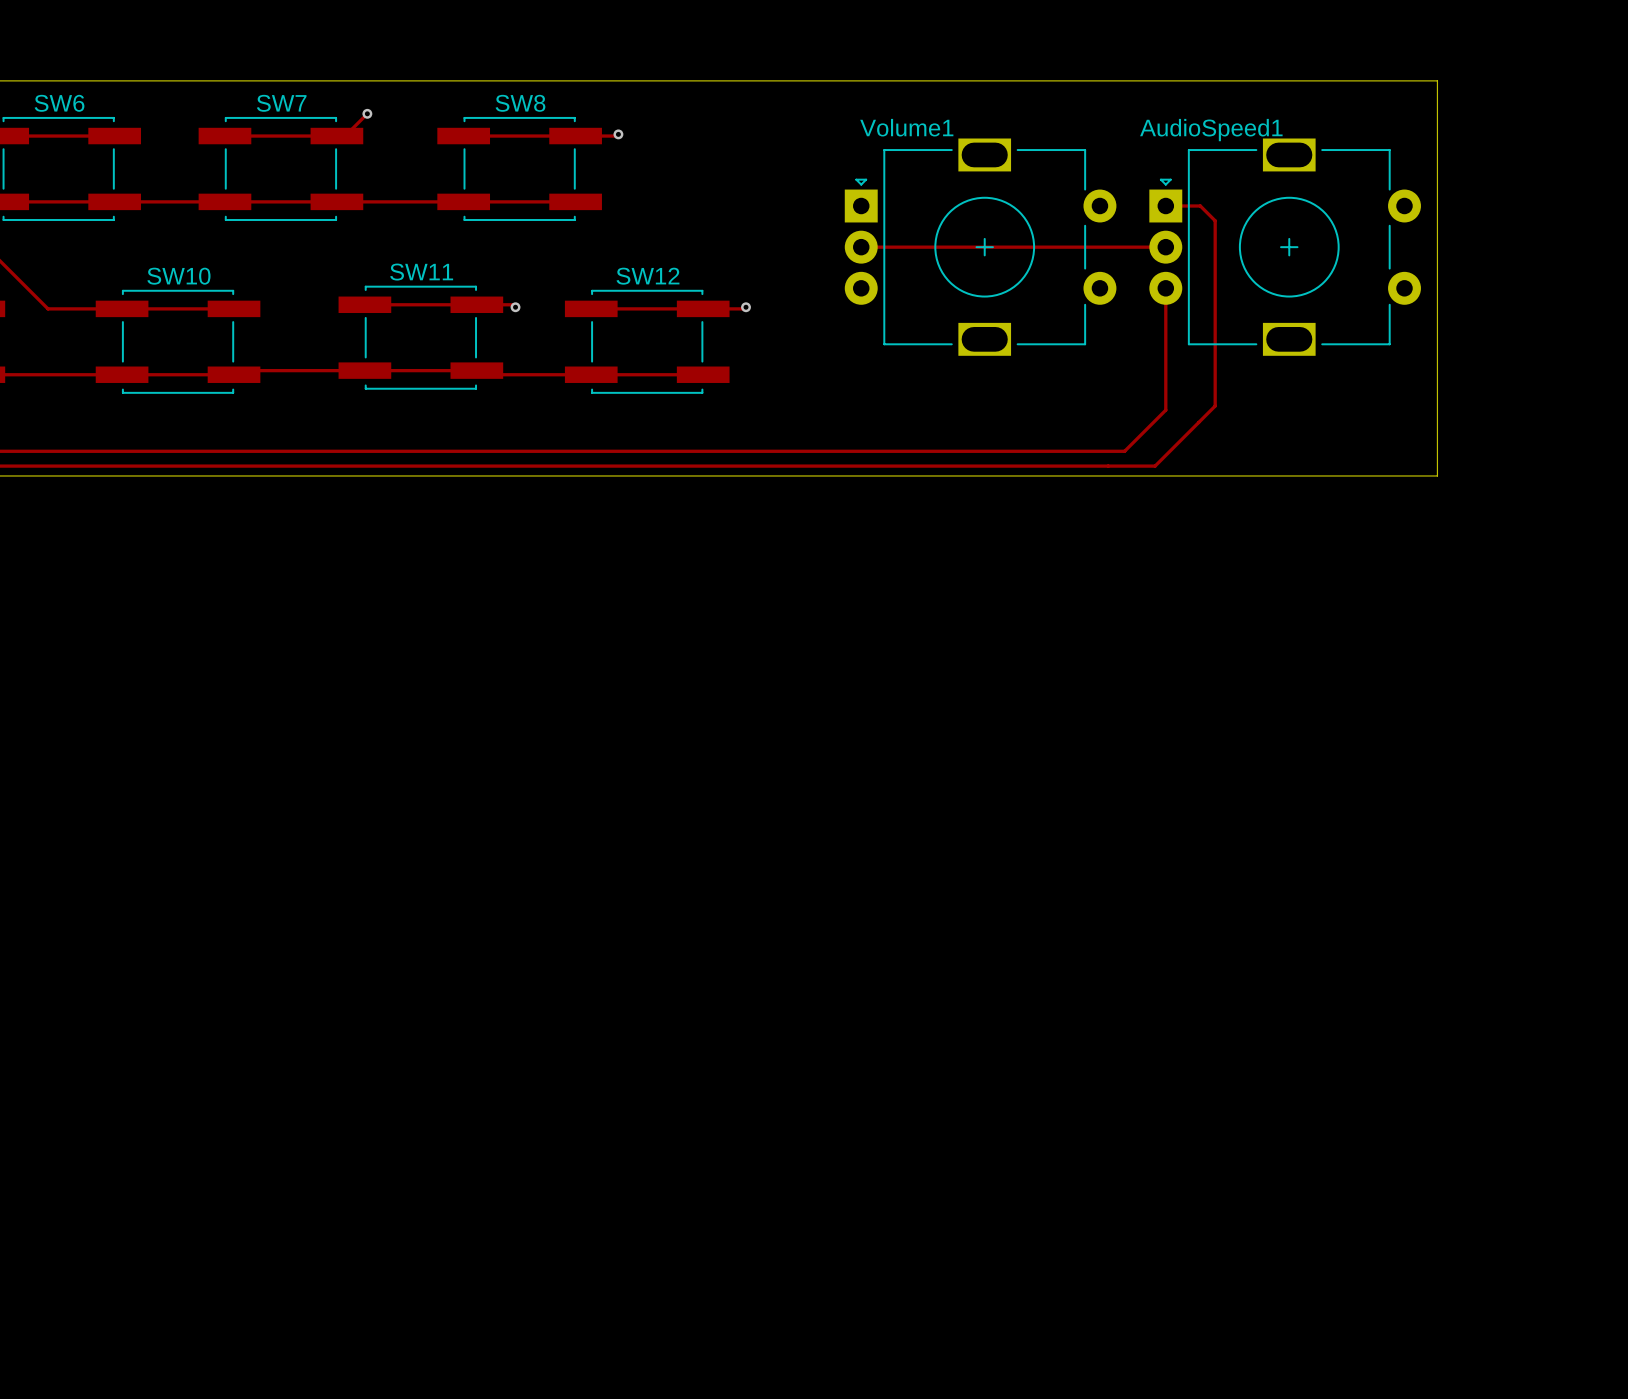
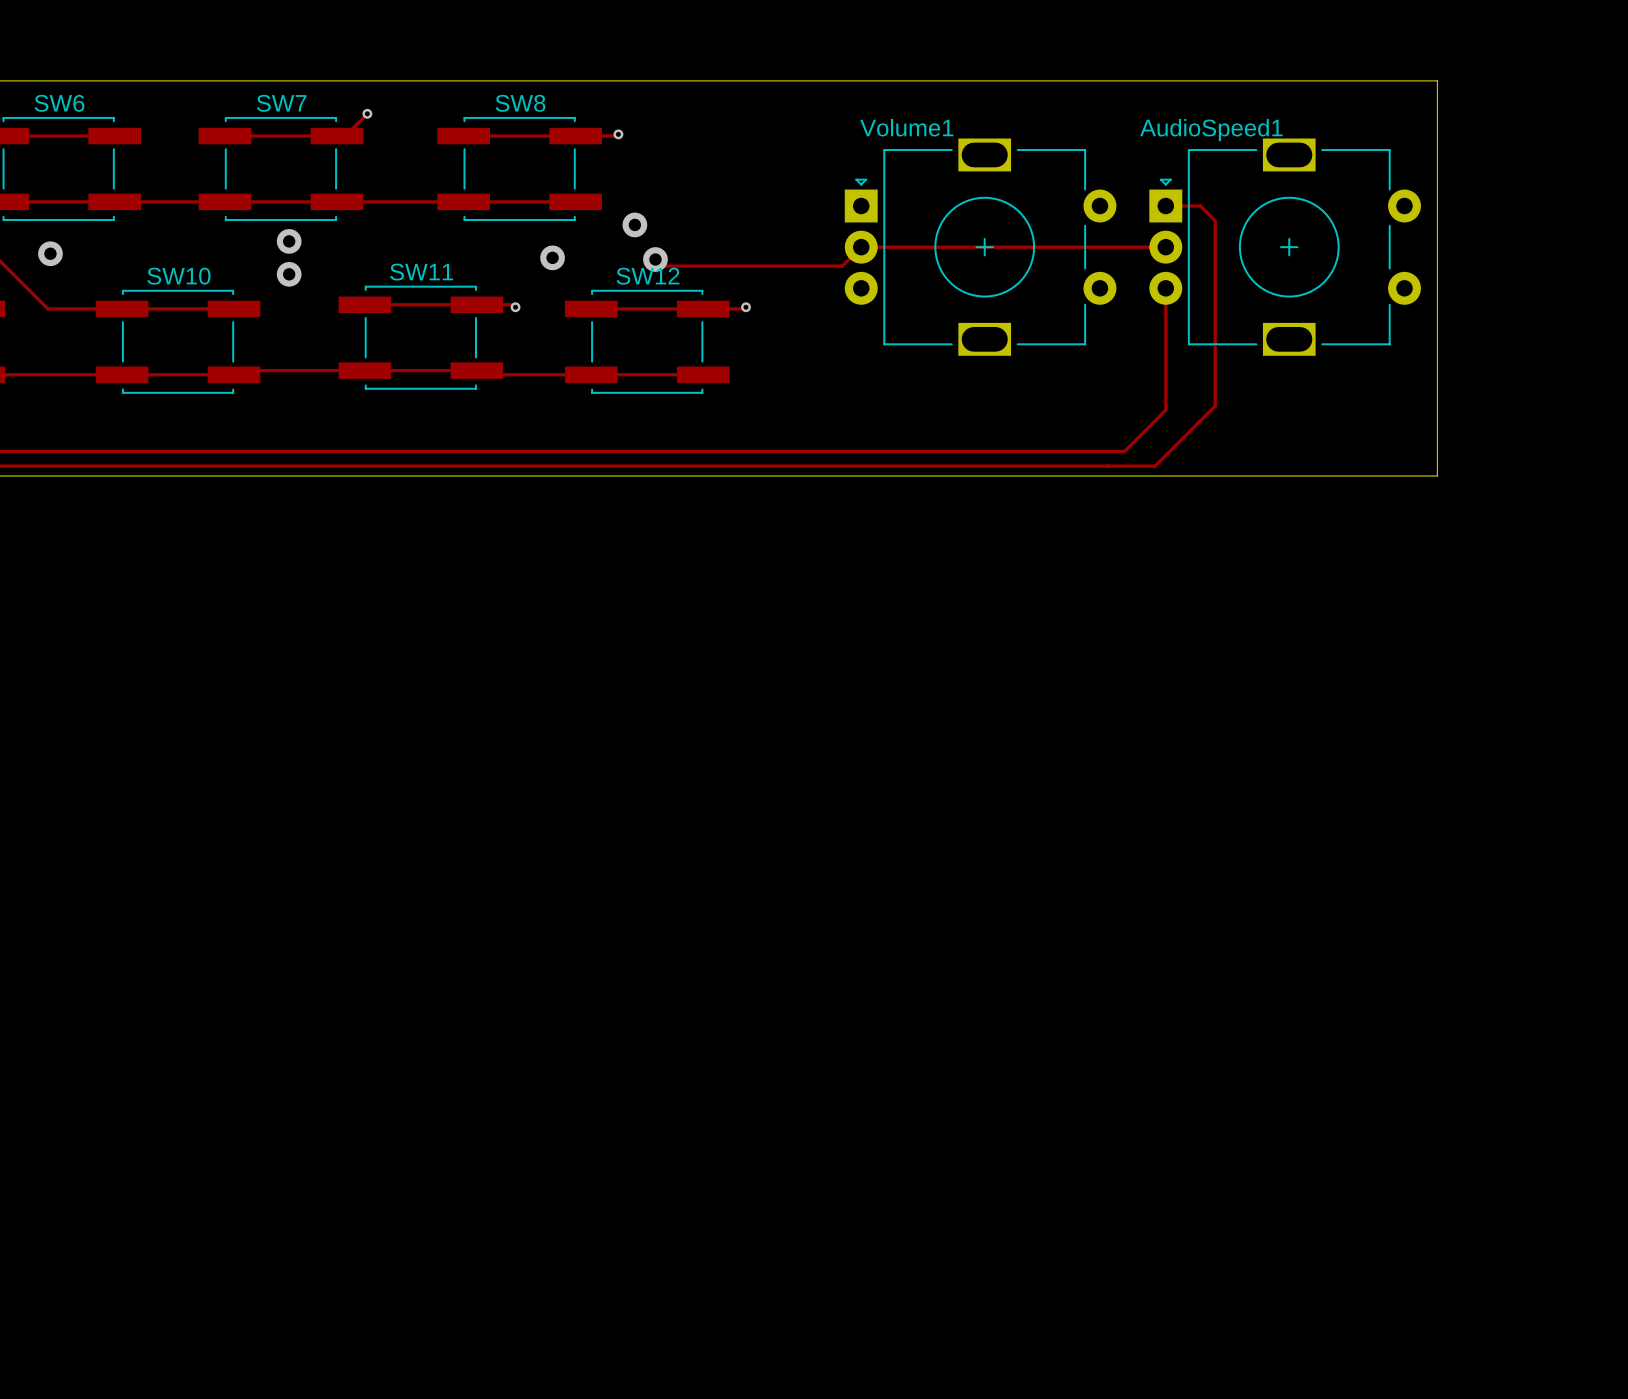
via: none -> (634, 224)
via: none -> (289, 241)
track: none -> (861, 247) (842, 266) (662, 266) (655, 259)
via: none -> (50, 253)
via: none -> (552, 257)
via: none -> (655, 259)
via: none -> (289, 274)

